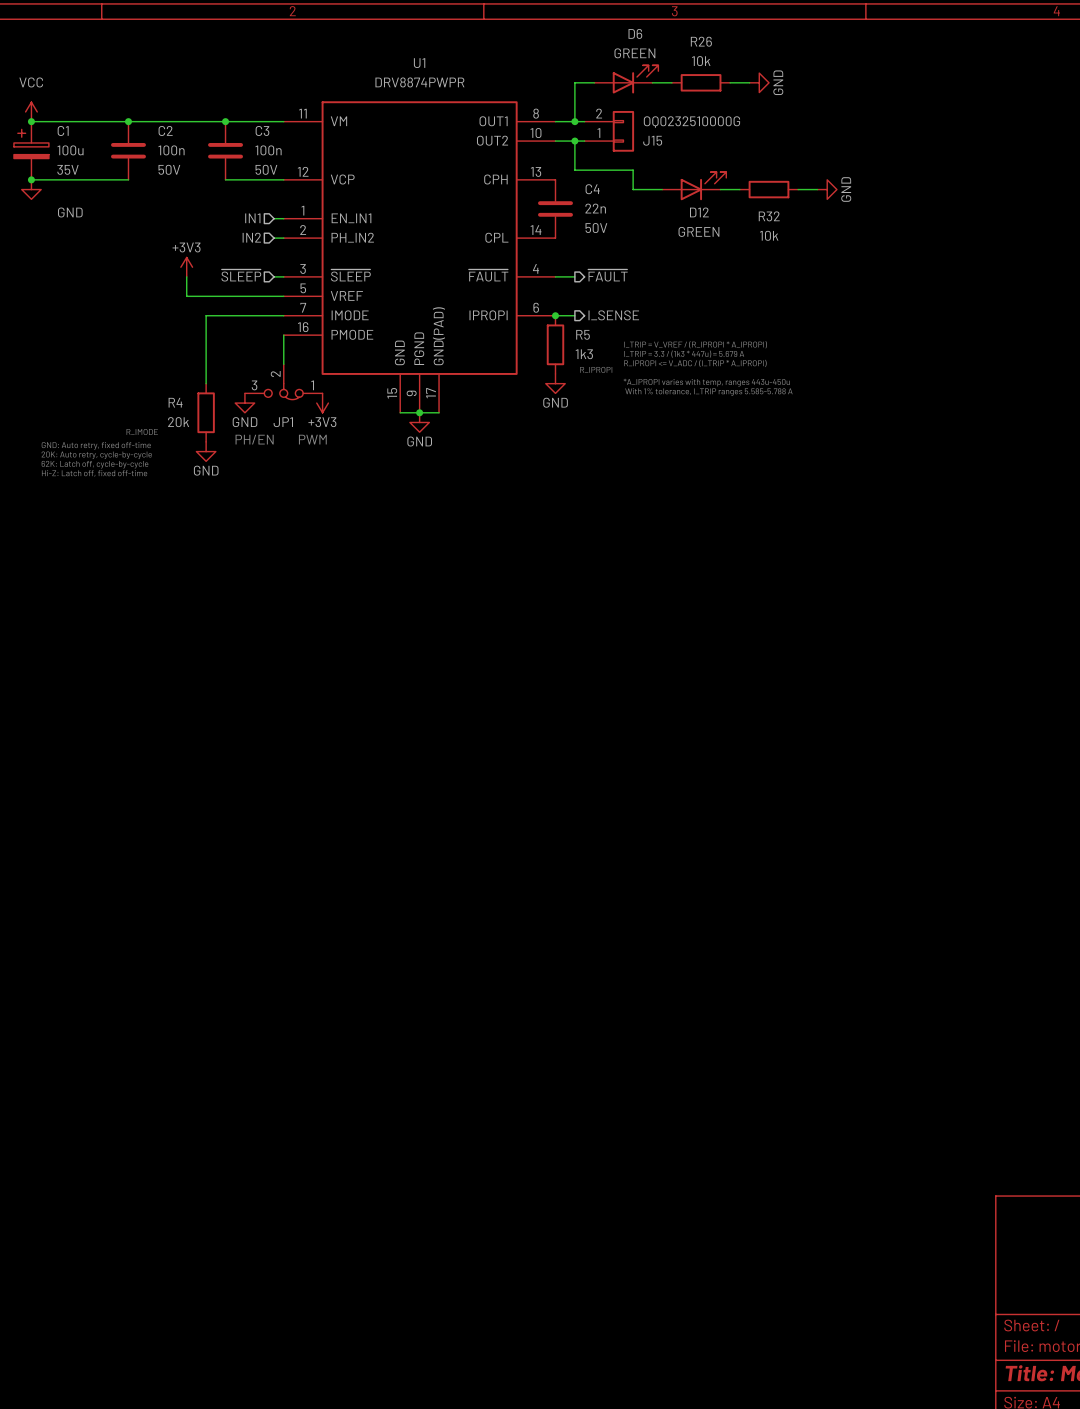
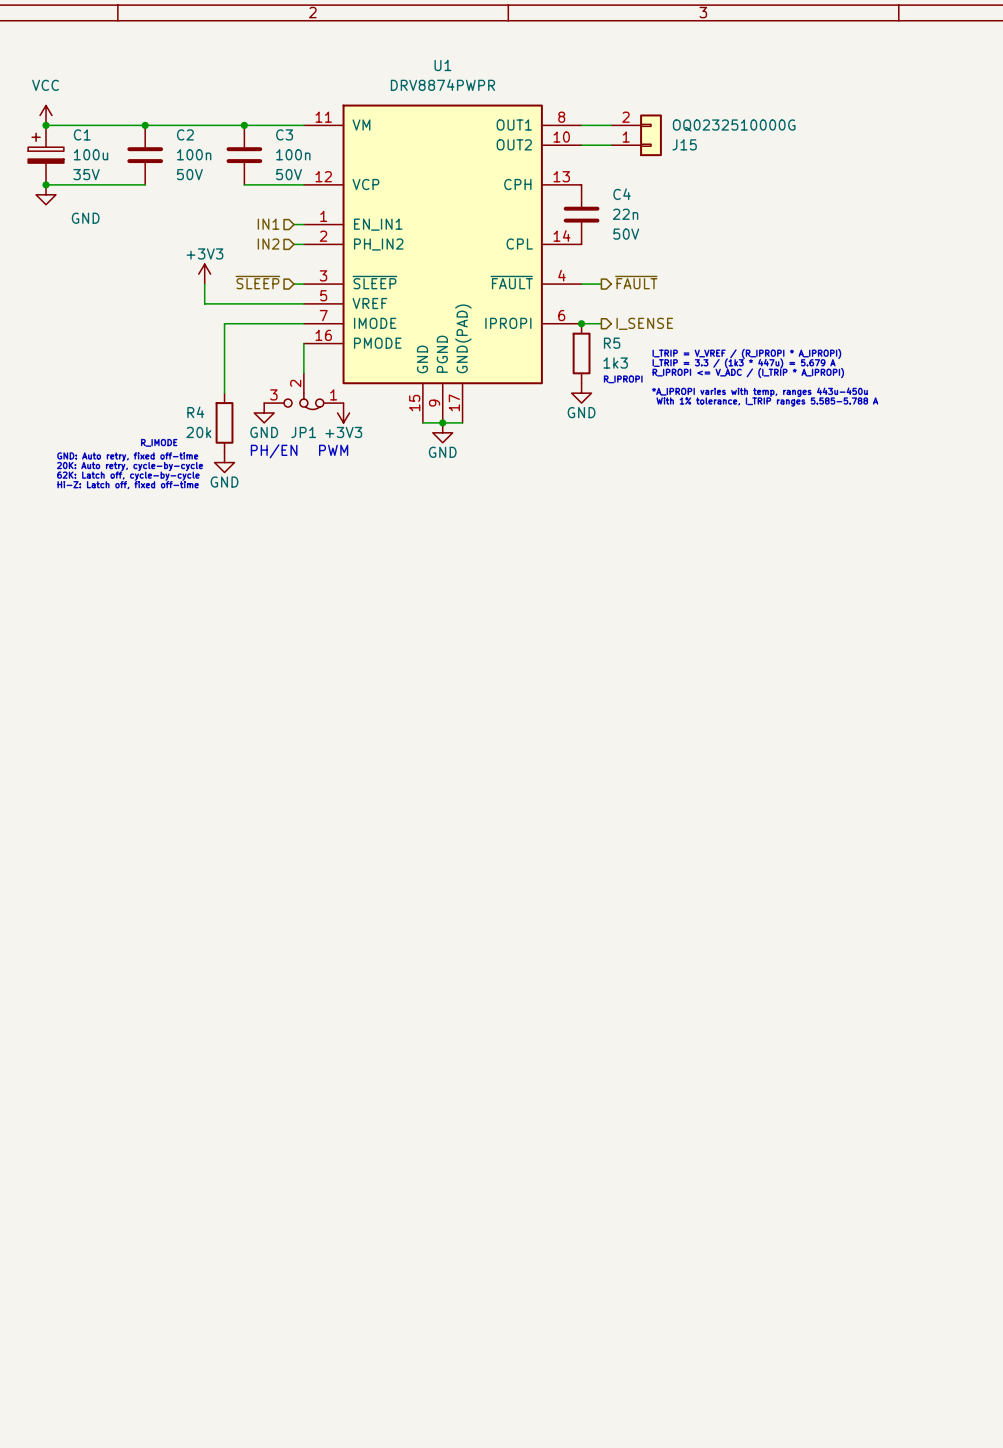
D6: GREEN (626, 79) -> none
wire: (594, 82) (574, 82) (574, 121) -> none
wire: (652, 82) (671, 82) -> none
R26: 10k (701, 82) -> none
wire: (730, 82) (749, 82) -> none
power symbol: GND (759, 82) -> none
junction: (574, 121) -> none
wire: (574, 141) (574, 170) (633, 170) (633, 189) (662, 189) -> none
junction: (574, 141) -> none
D12: GREEN (694, 186) -> none
wire: (720, 189) (739, 189) -> none
R32: 10k (768, 189) -> none
wire: (798, 189) (817, 189) -> none
power symbol: GND (827, 189) -> none

